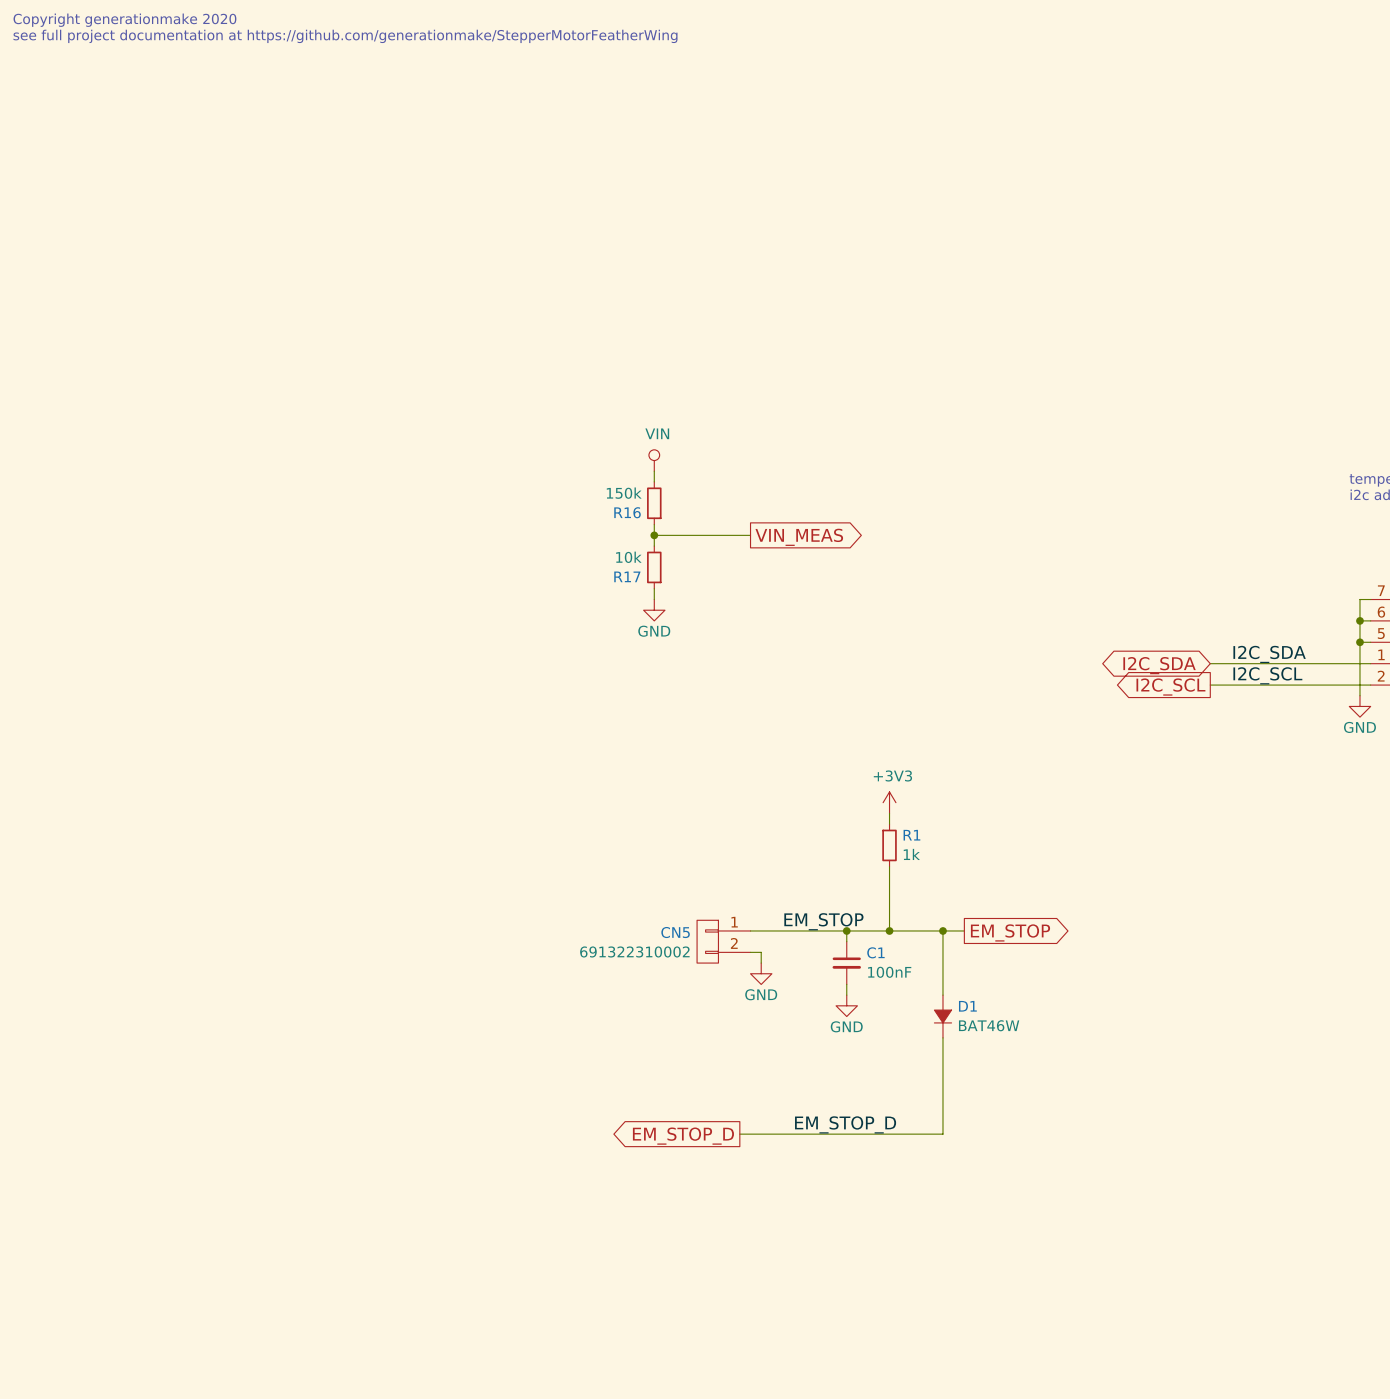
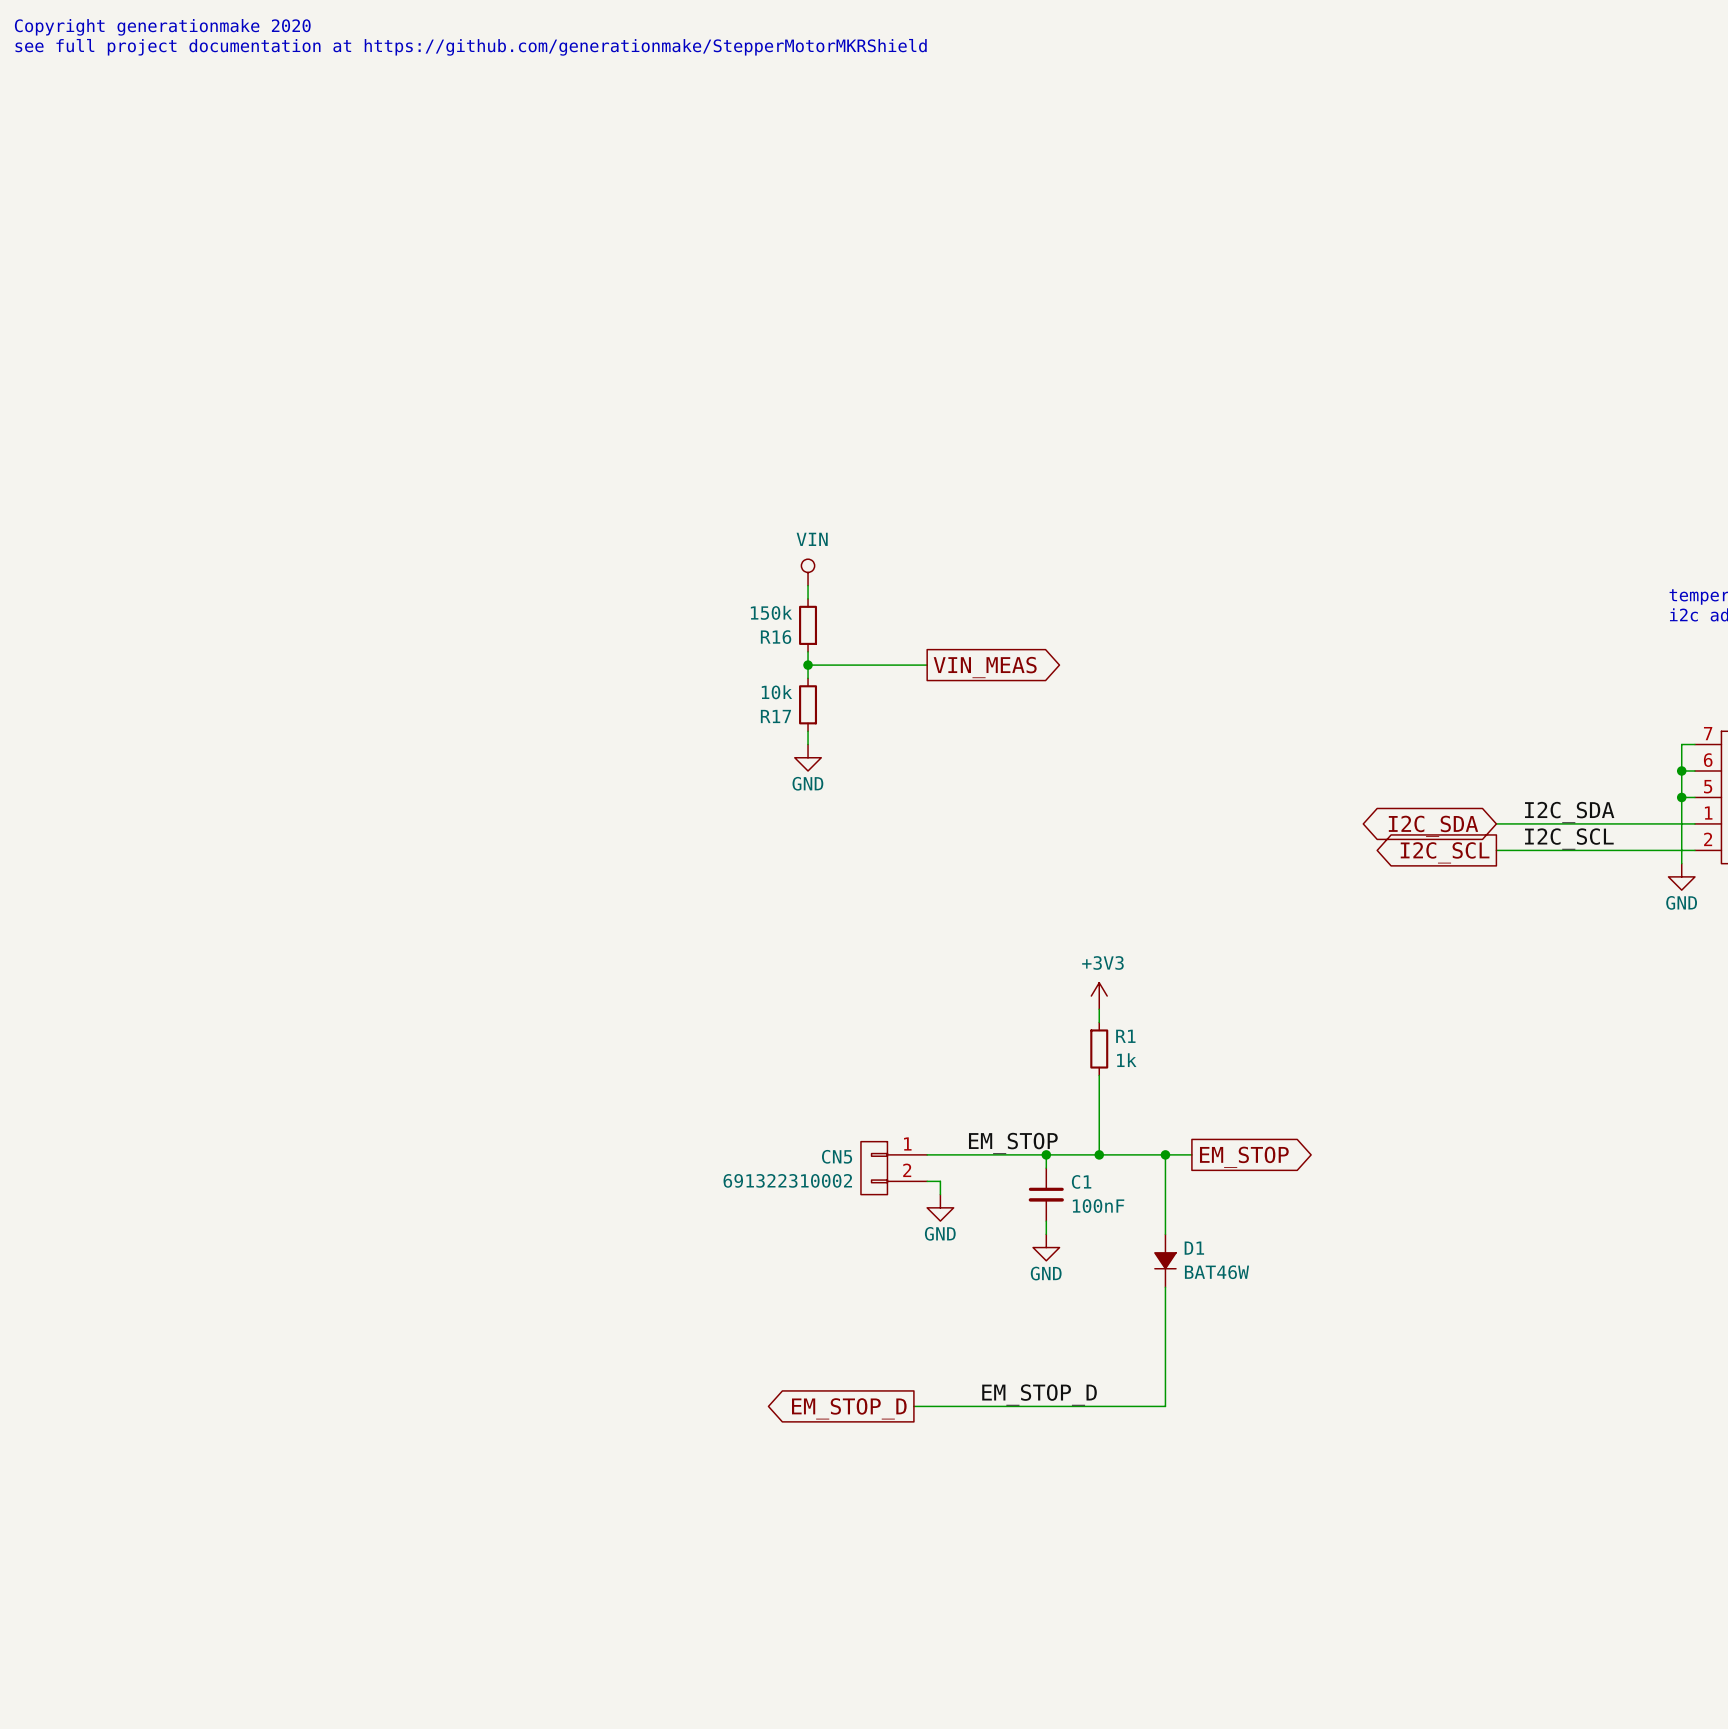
text: see full project documentation at https://github.com/generationmake/StepperMotorFeatherWing (345, 36) -> see full project documentation at https://github.com/generationmake/StepperMotorMKRShield (471, 47)

